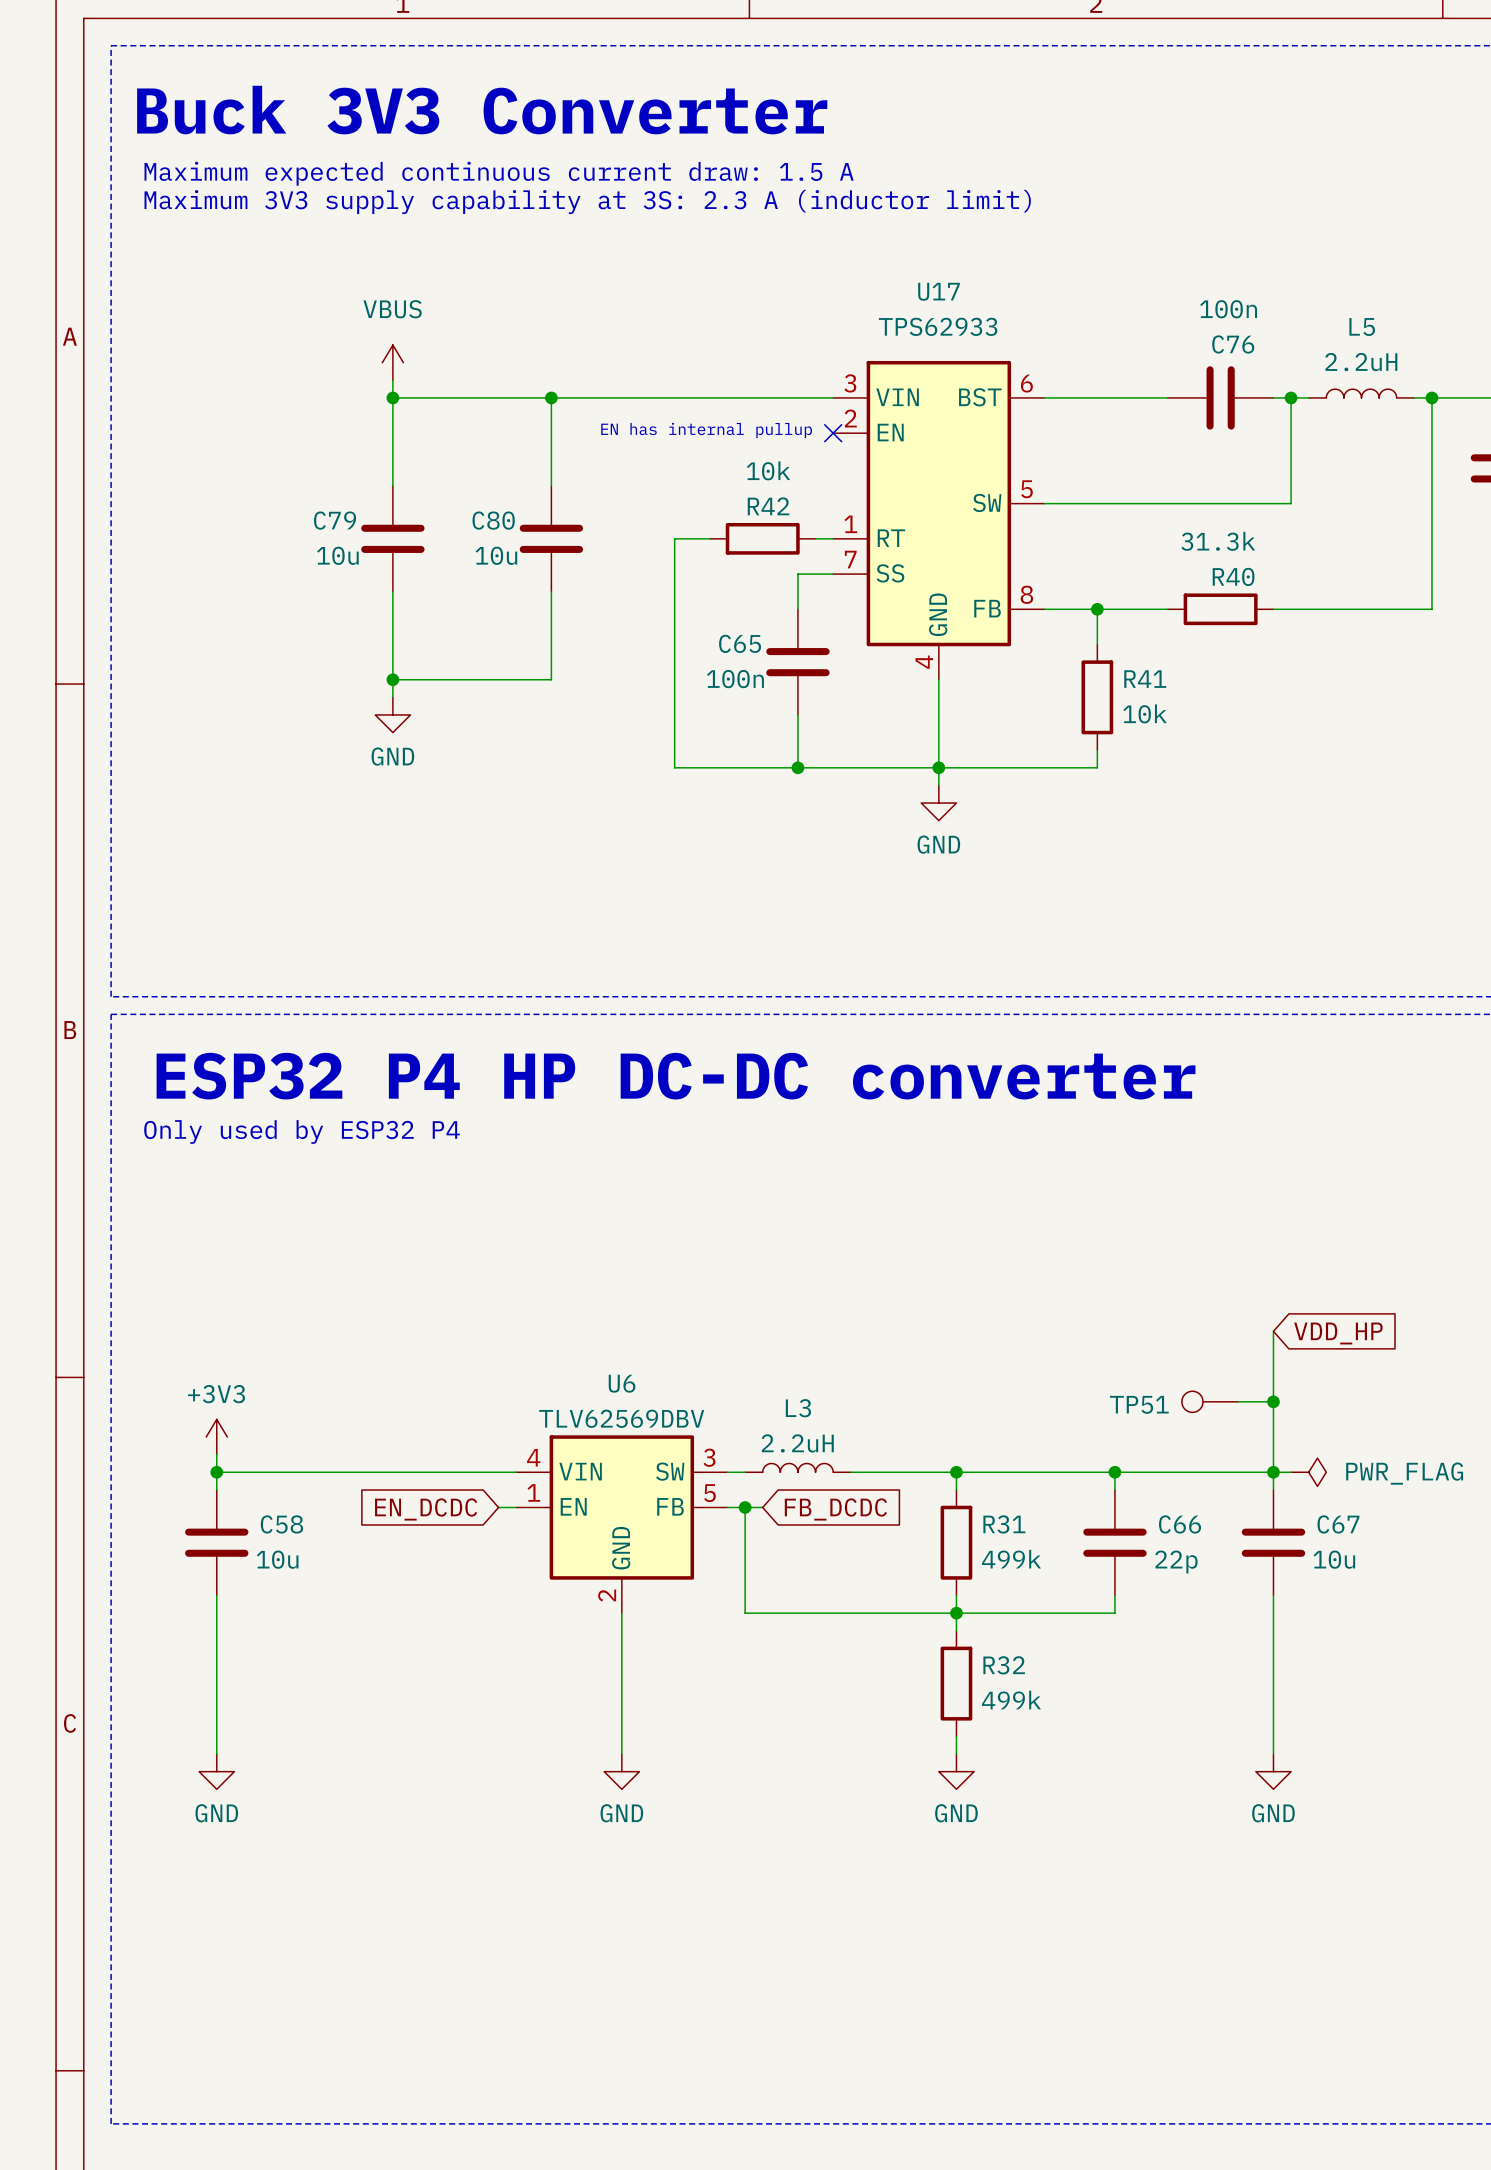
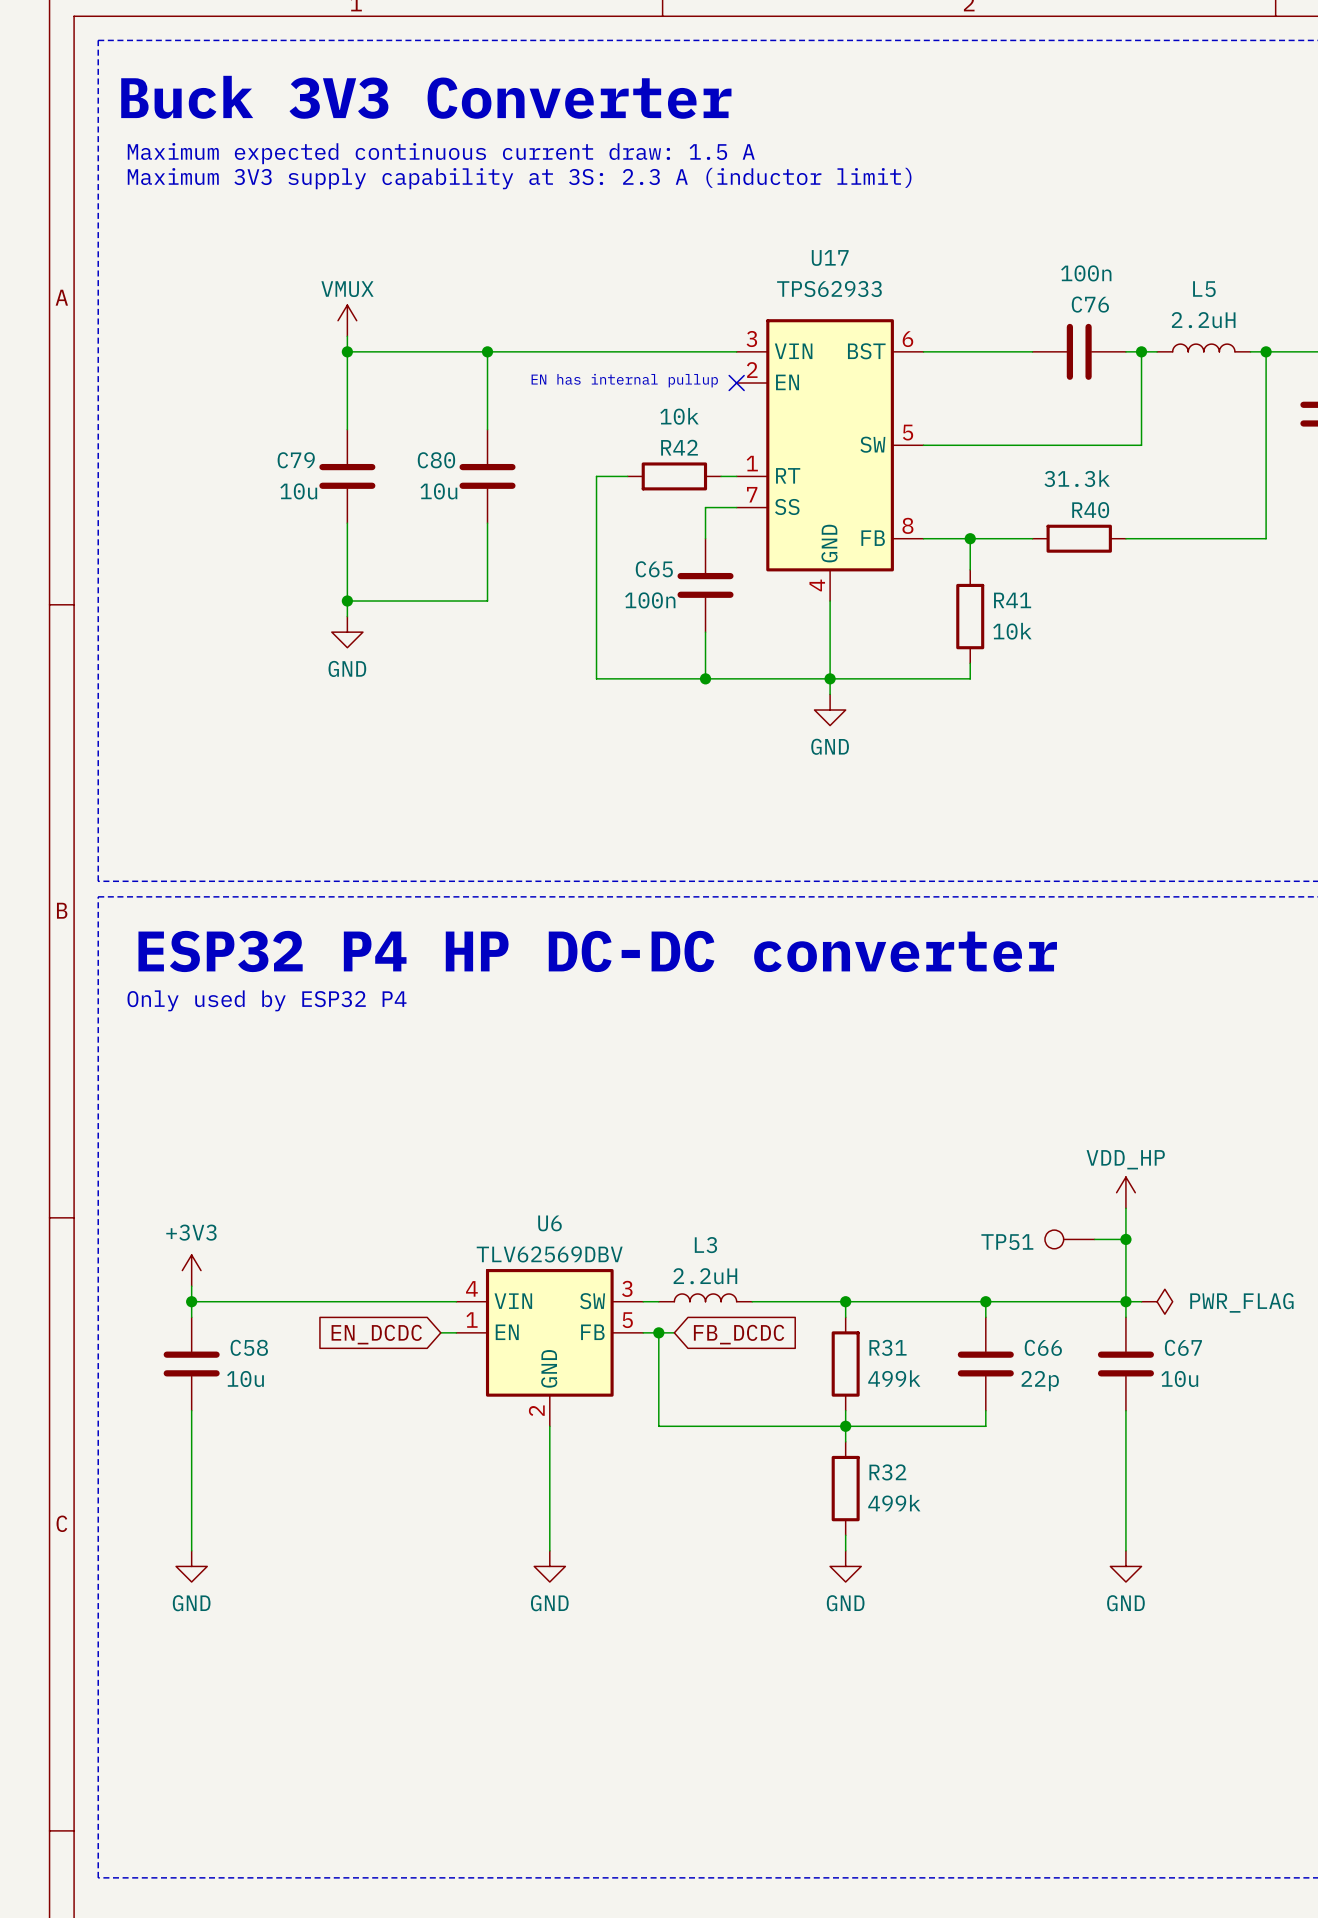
power symbol: VBUS (392, 362) -> VMUX (347, 320)
global label: VDD_HP (1338, 1333) -> none
power symbol: none -> VDD_HP (1125, 1192)

